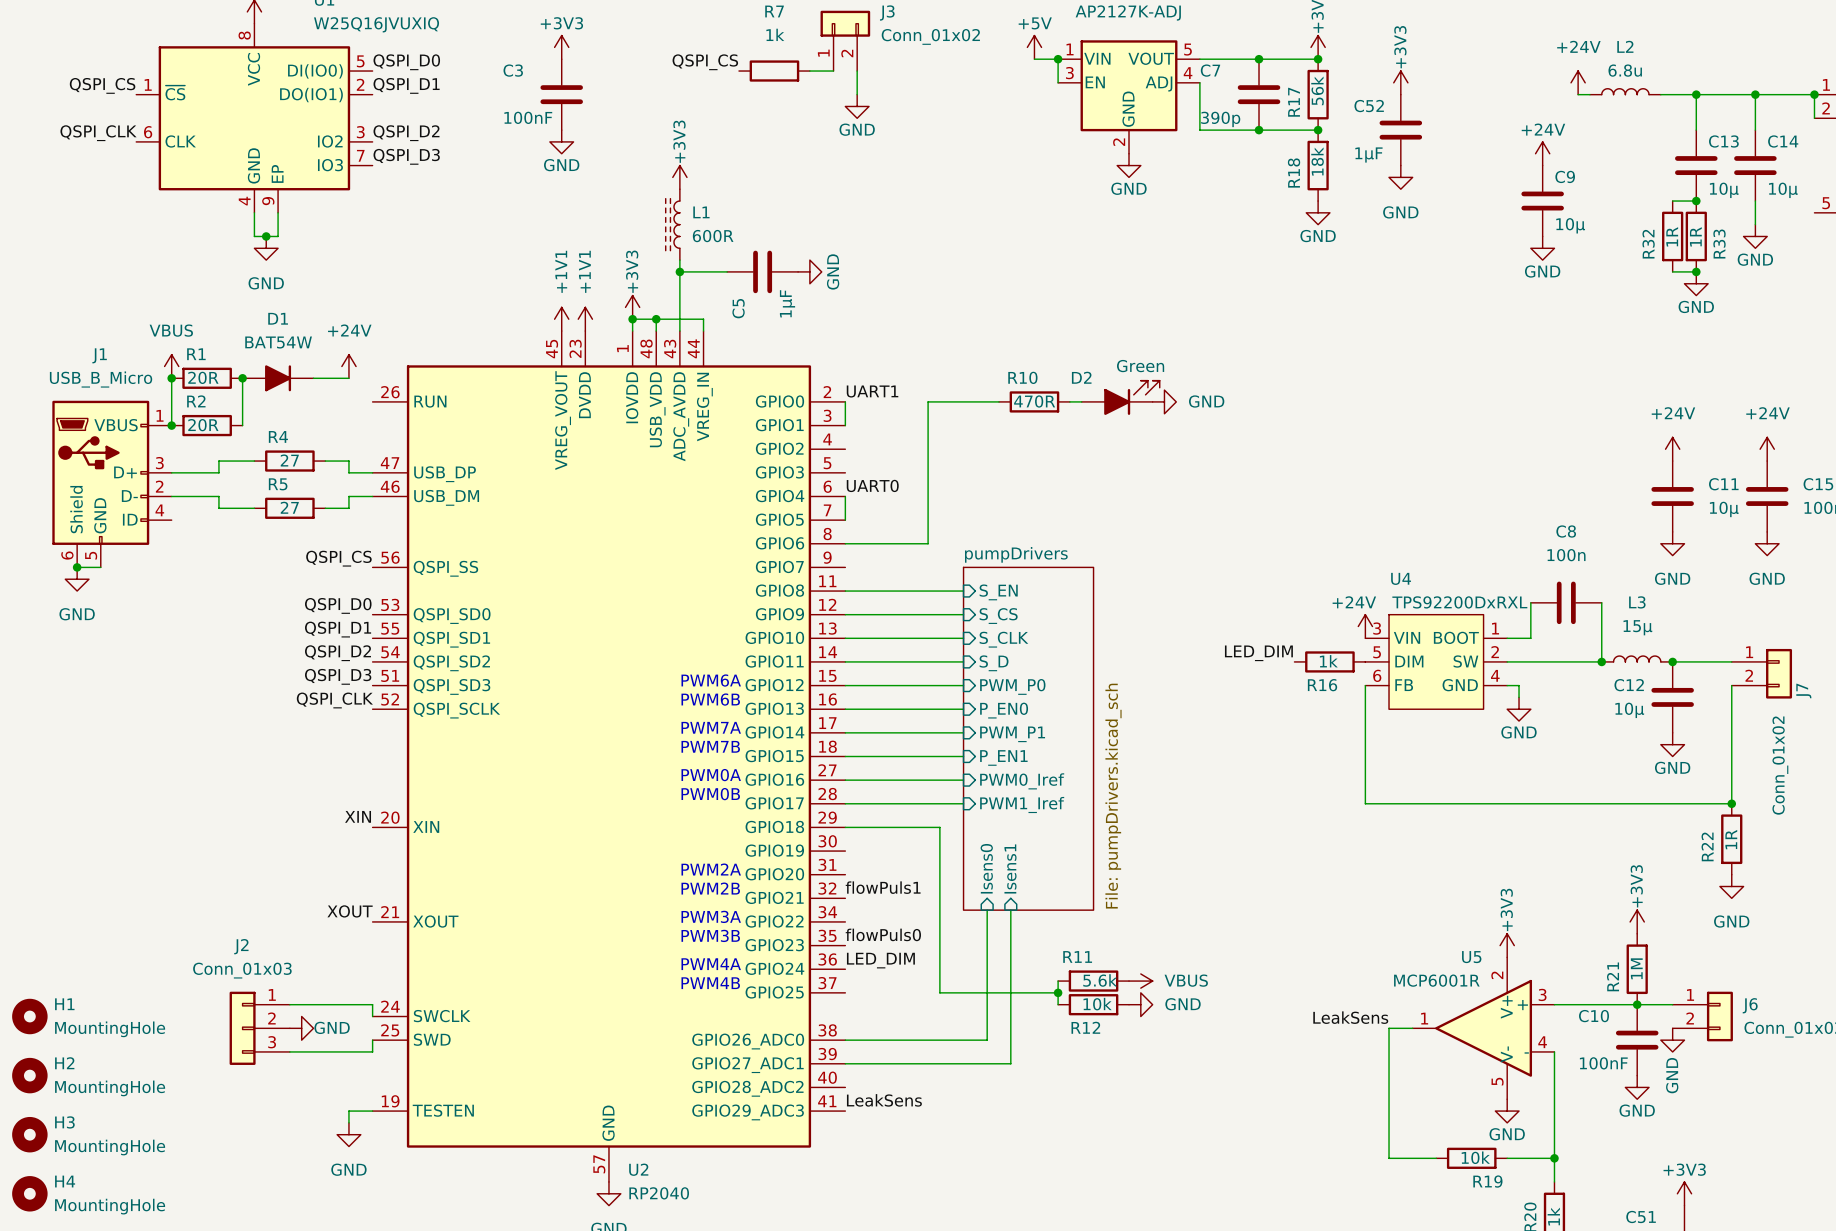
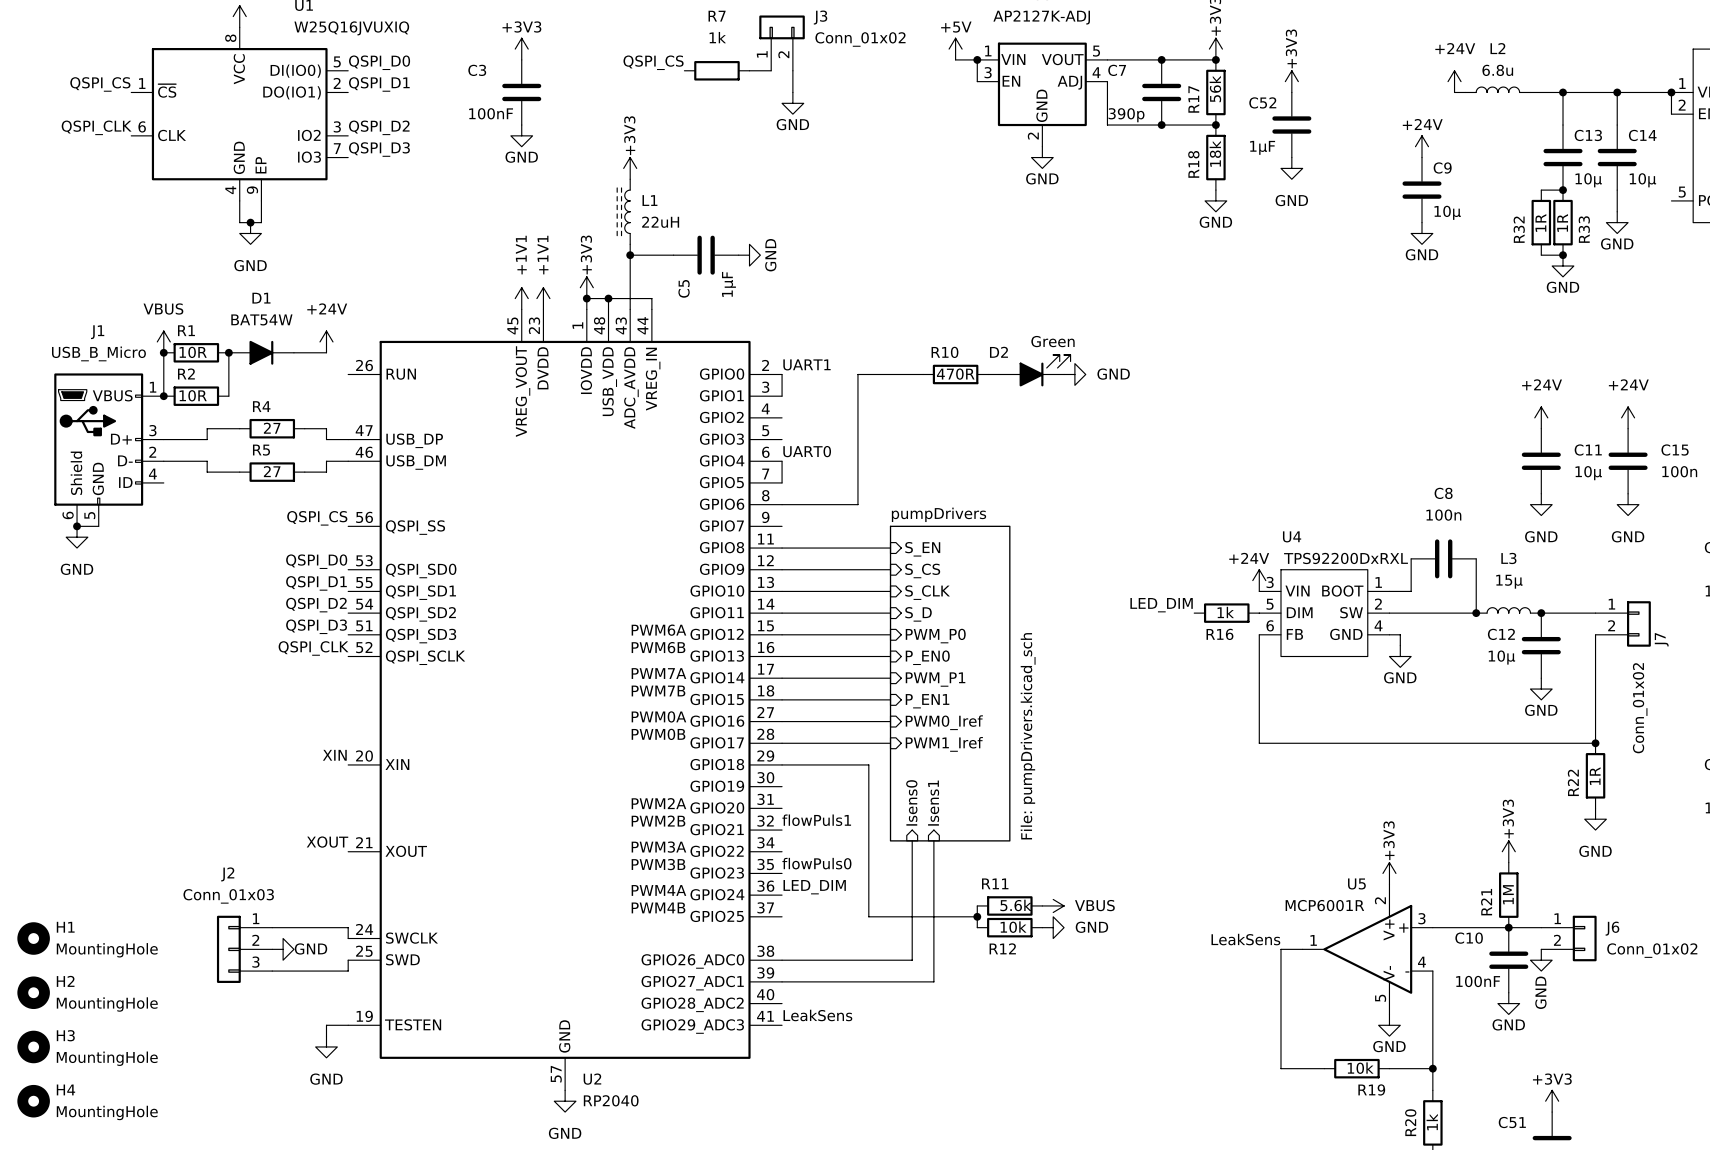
L1 value: 600R (713, 236) -> 22uH (660, 222)
R1 value: 20R (203, 377) -> 10R (193, 352)
R2 value: 20R (203, 425) -> 10R (193, 395)

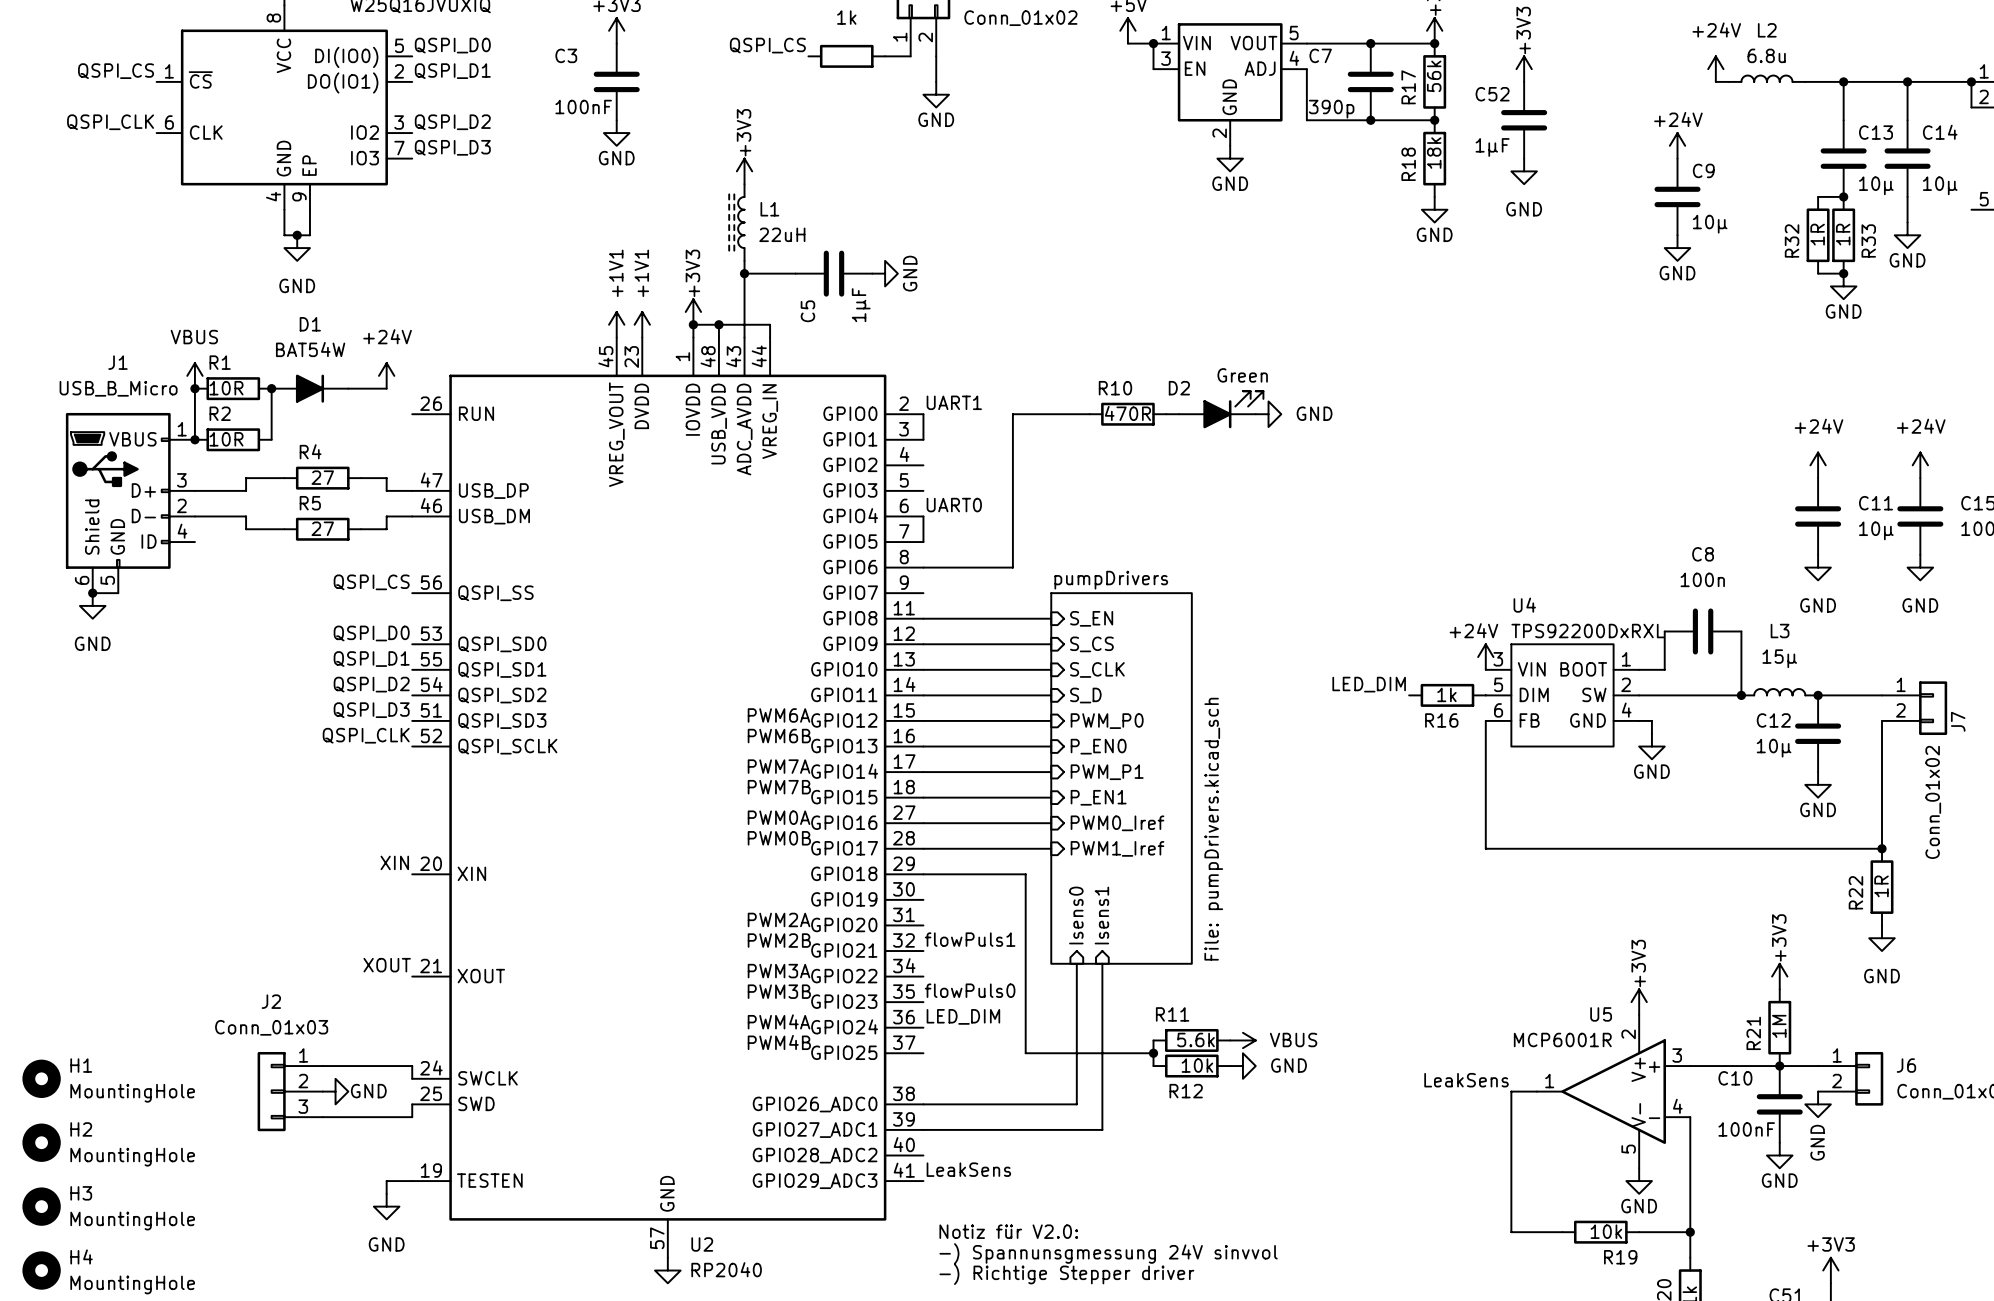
text: none -> Notiz für V2.0: (1008, 1231)
text: none -> -) Spannunsgmessung 24V sinvvol (1108, 1253)
text: none -> -) Richtige Stepper driver (1066, 1274)

